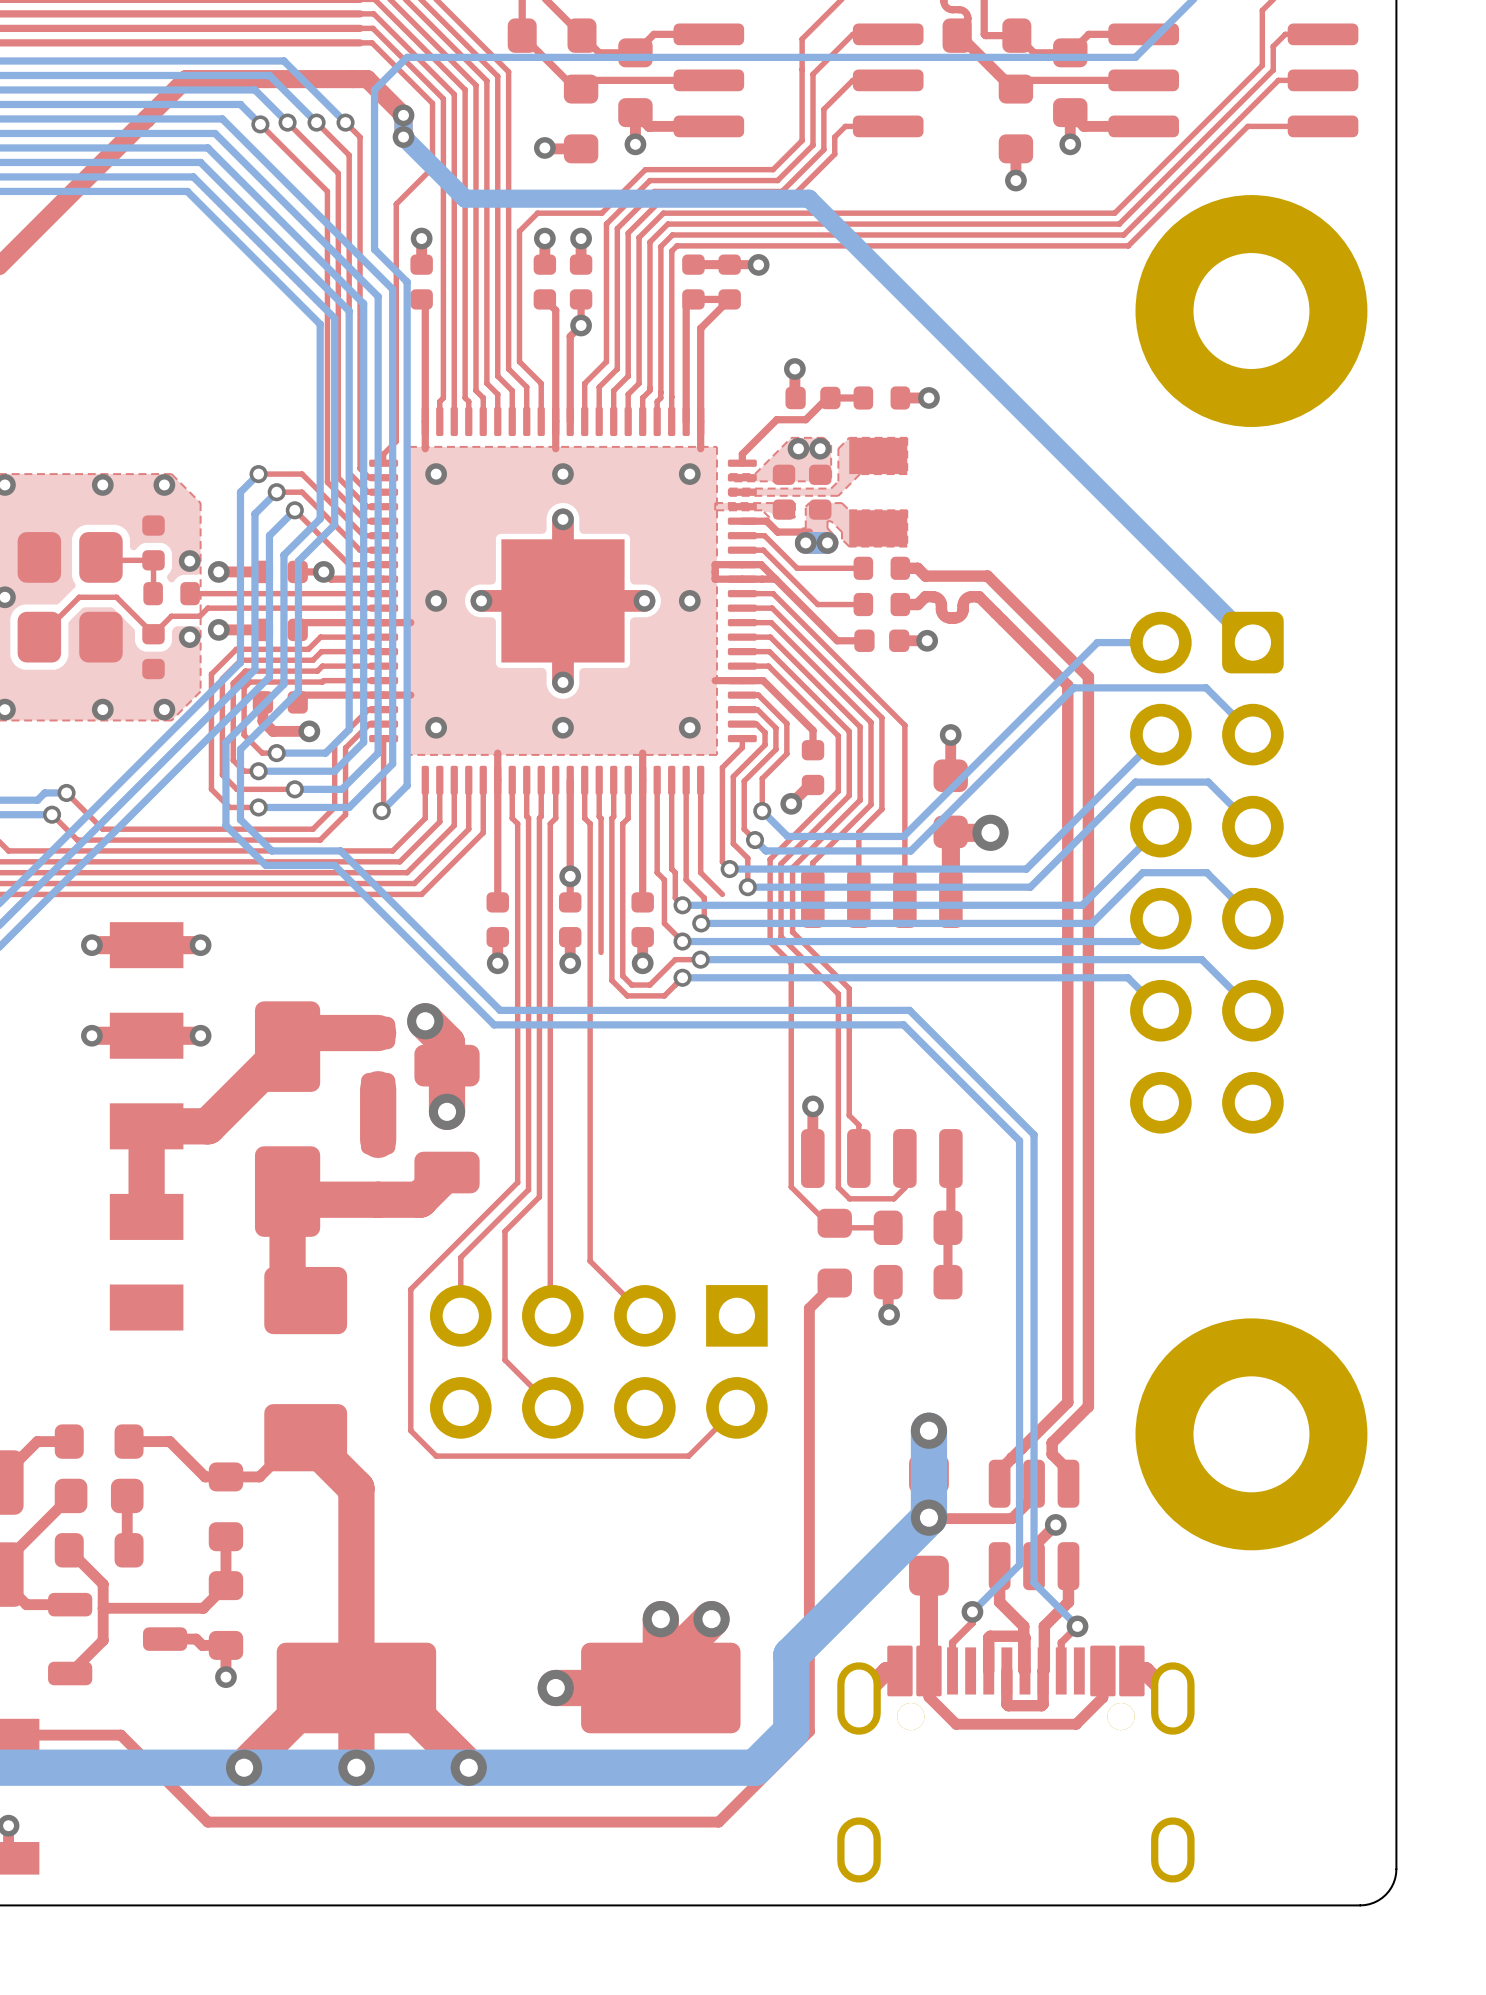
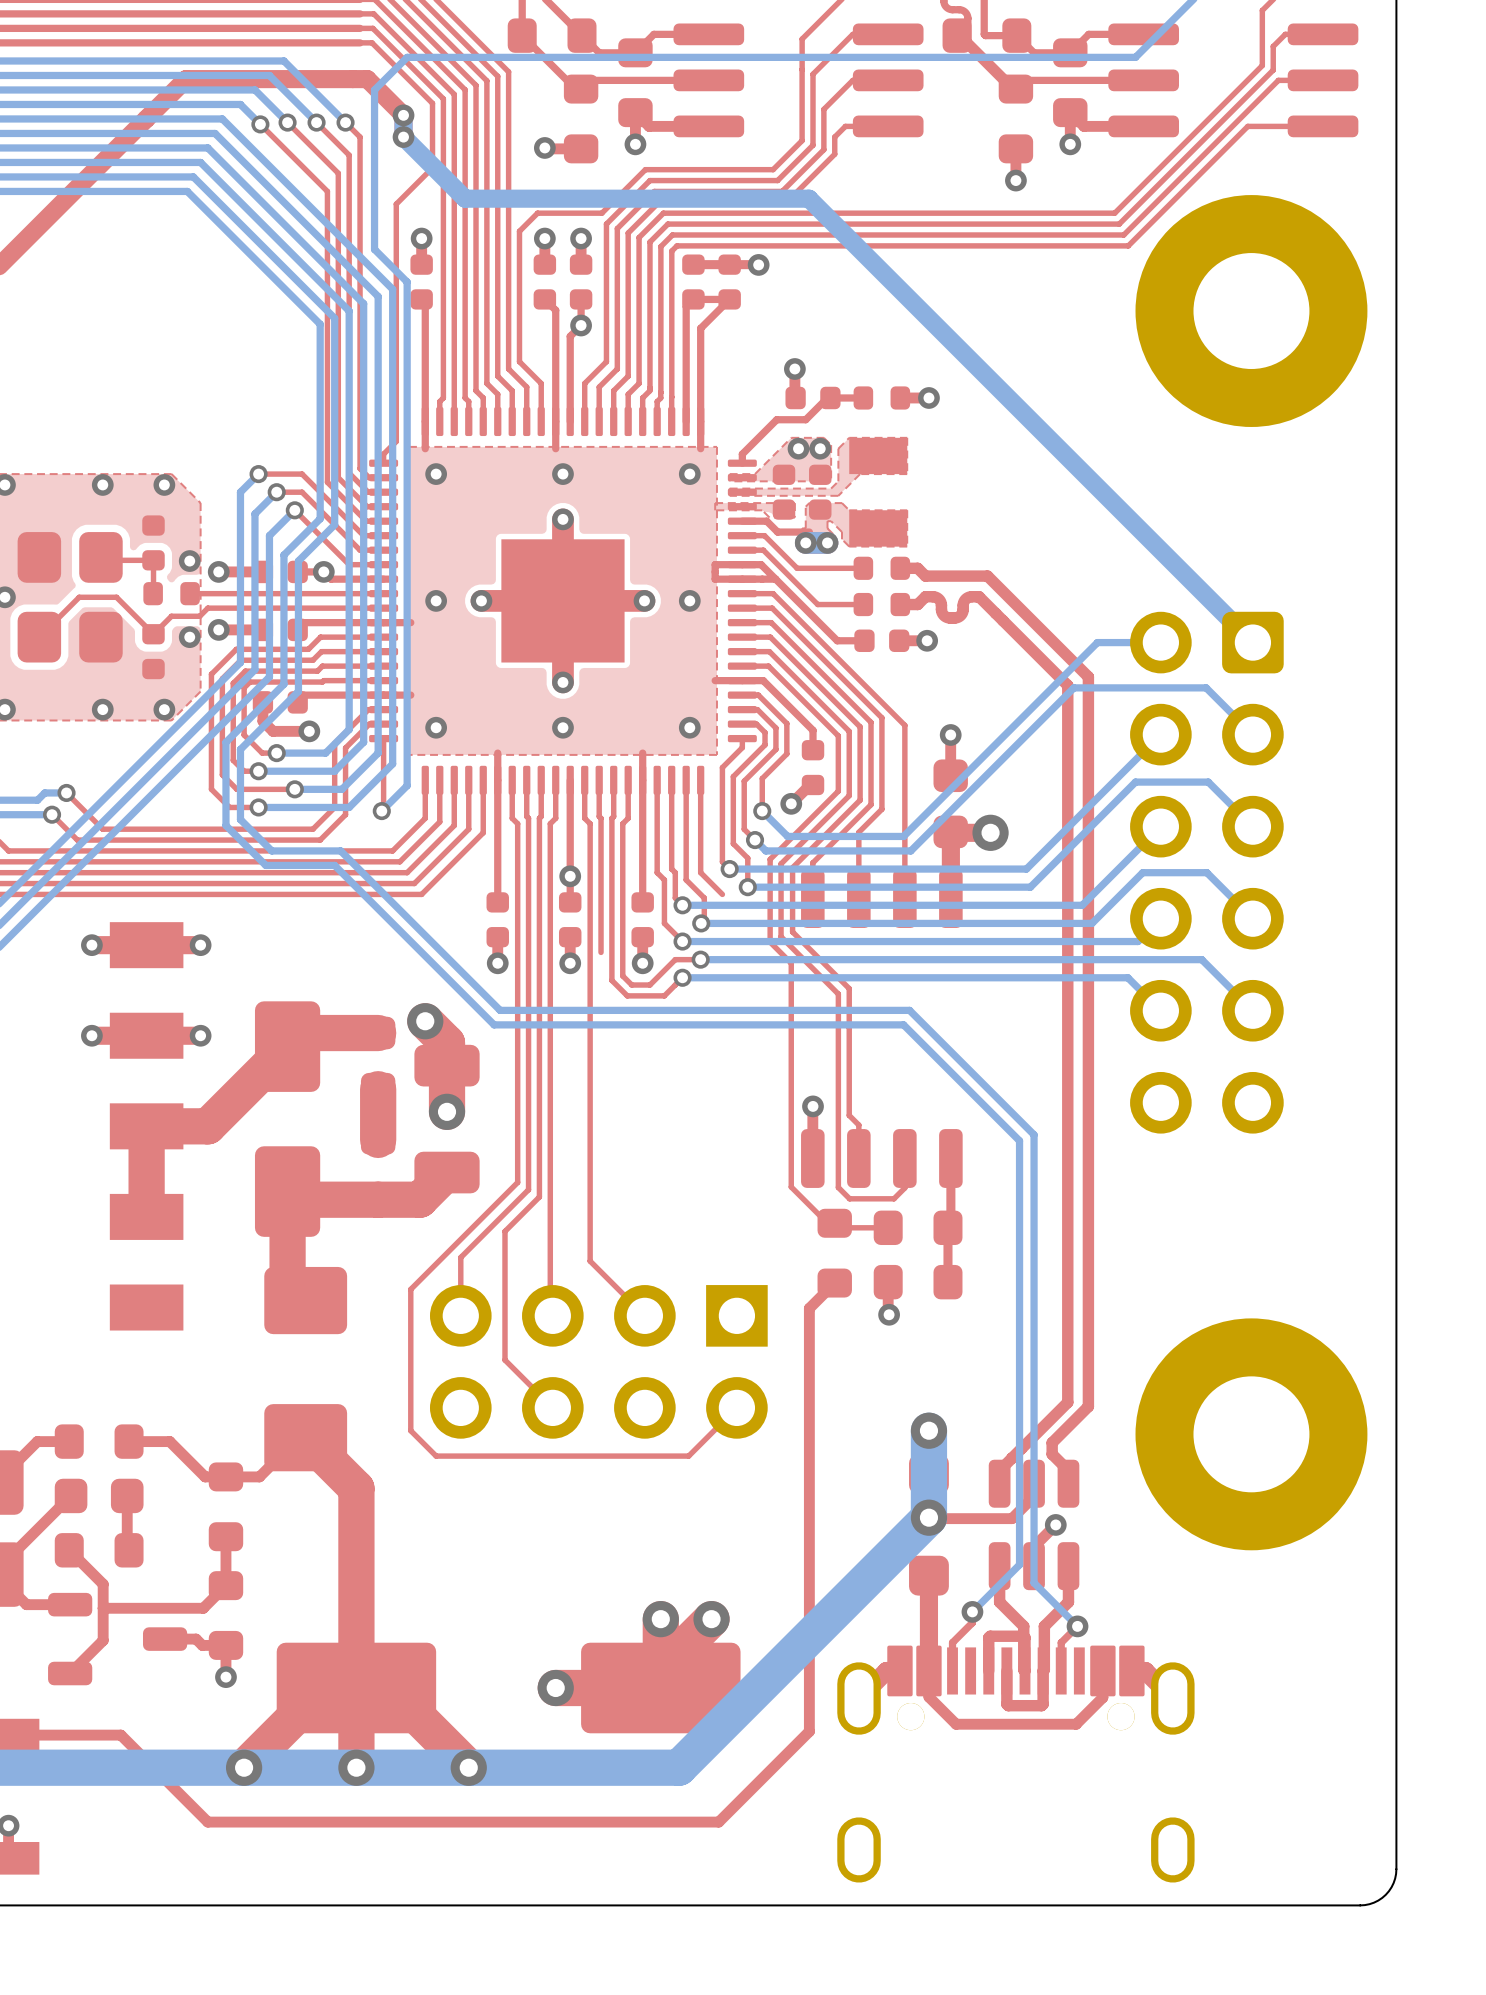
bottom track: (791, 1655) (791, 1731) (755, 1767) (678, 1767) -> (791, 1655) (678, 1767)

